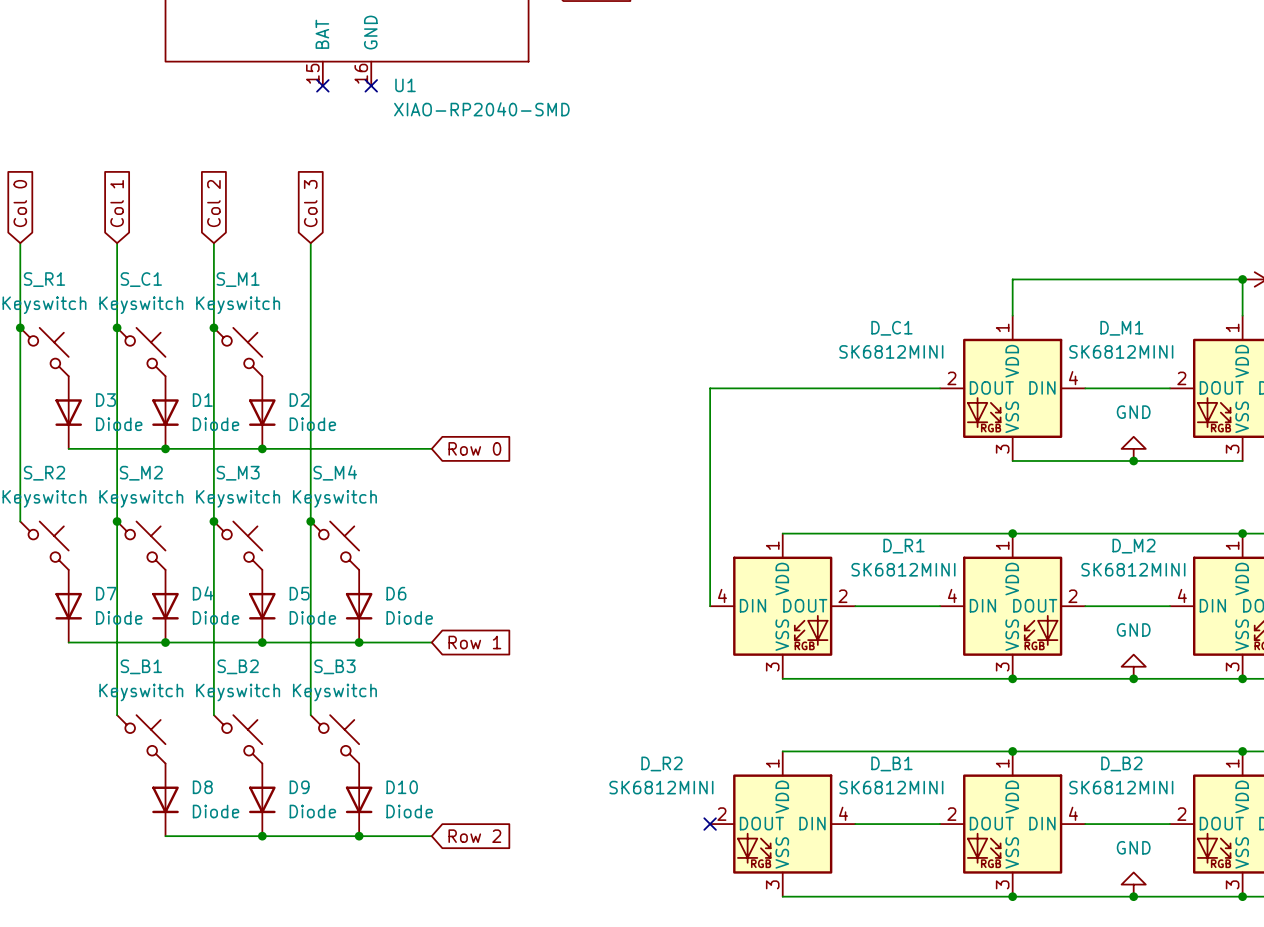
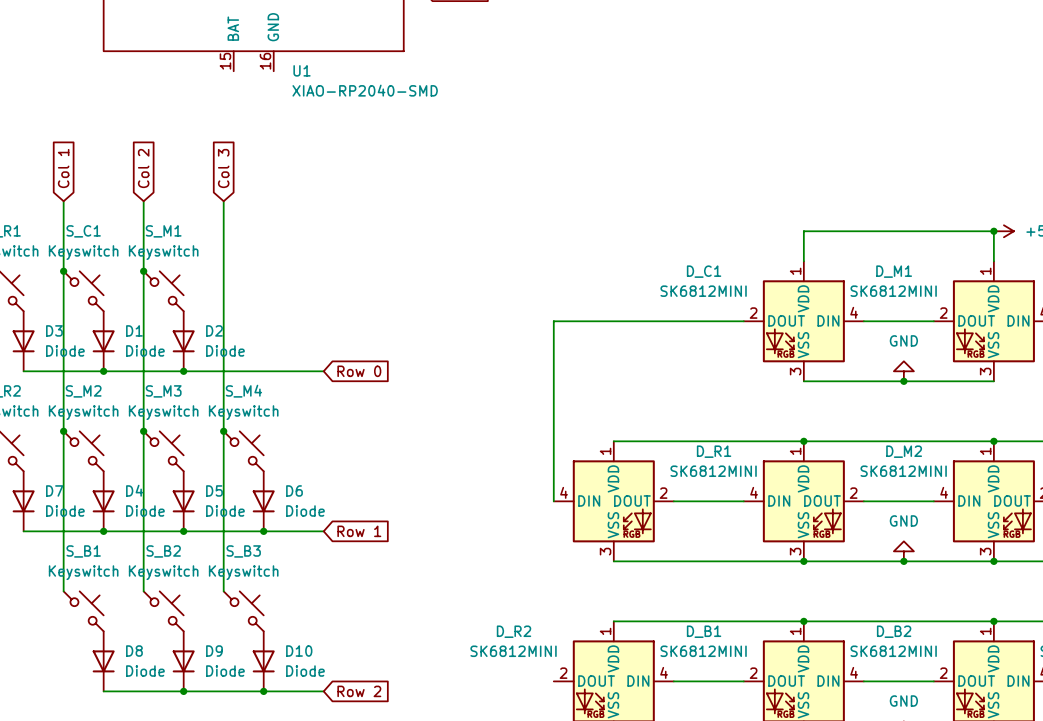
no-connect mark: (322, 85) -> none
no-connect mark: (371, 85) -> none
no-connect mark: (710, 824) -> none

